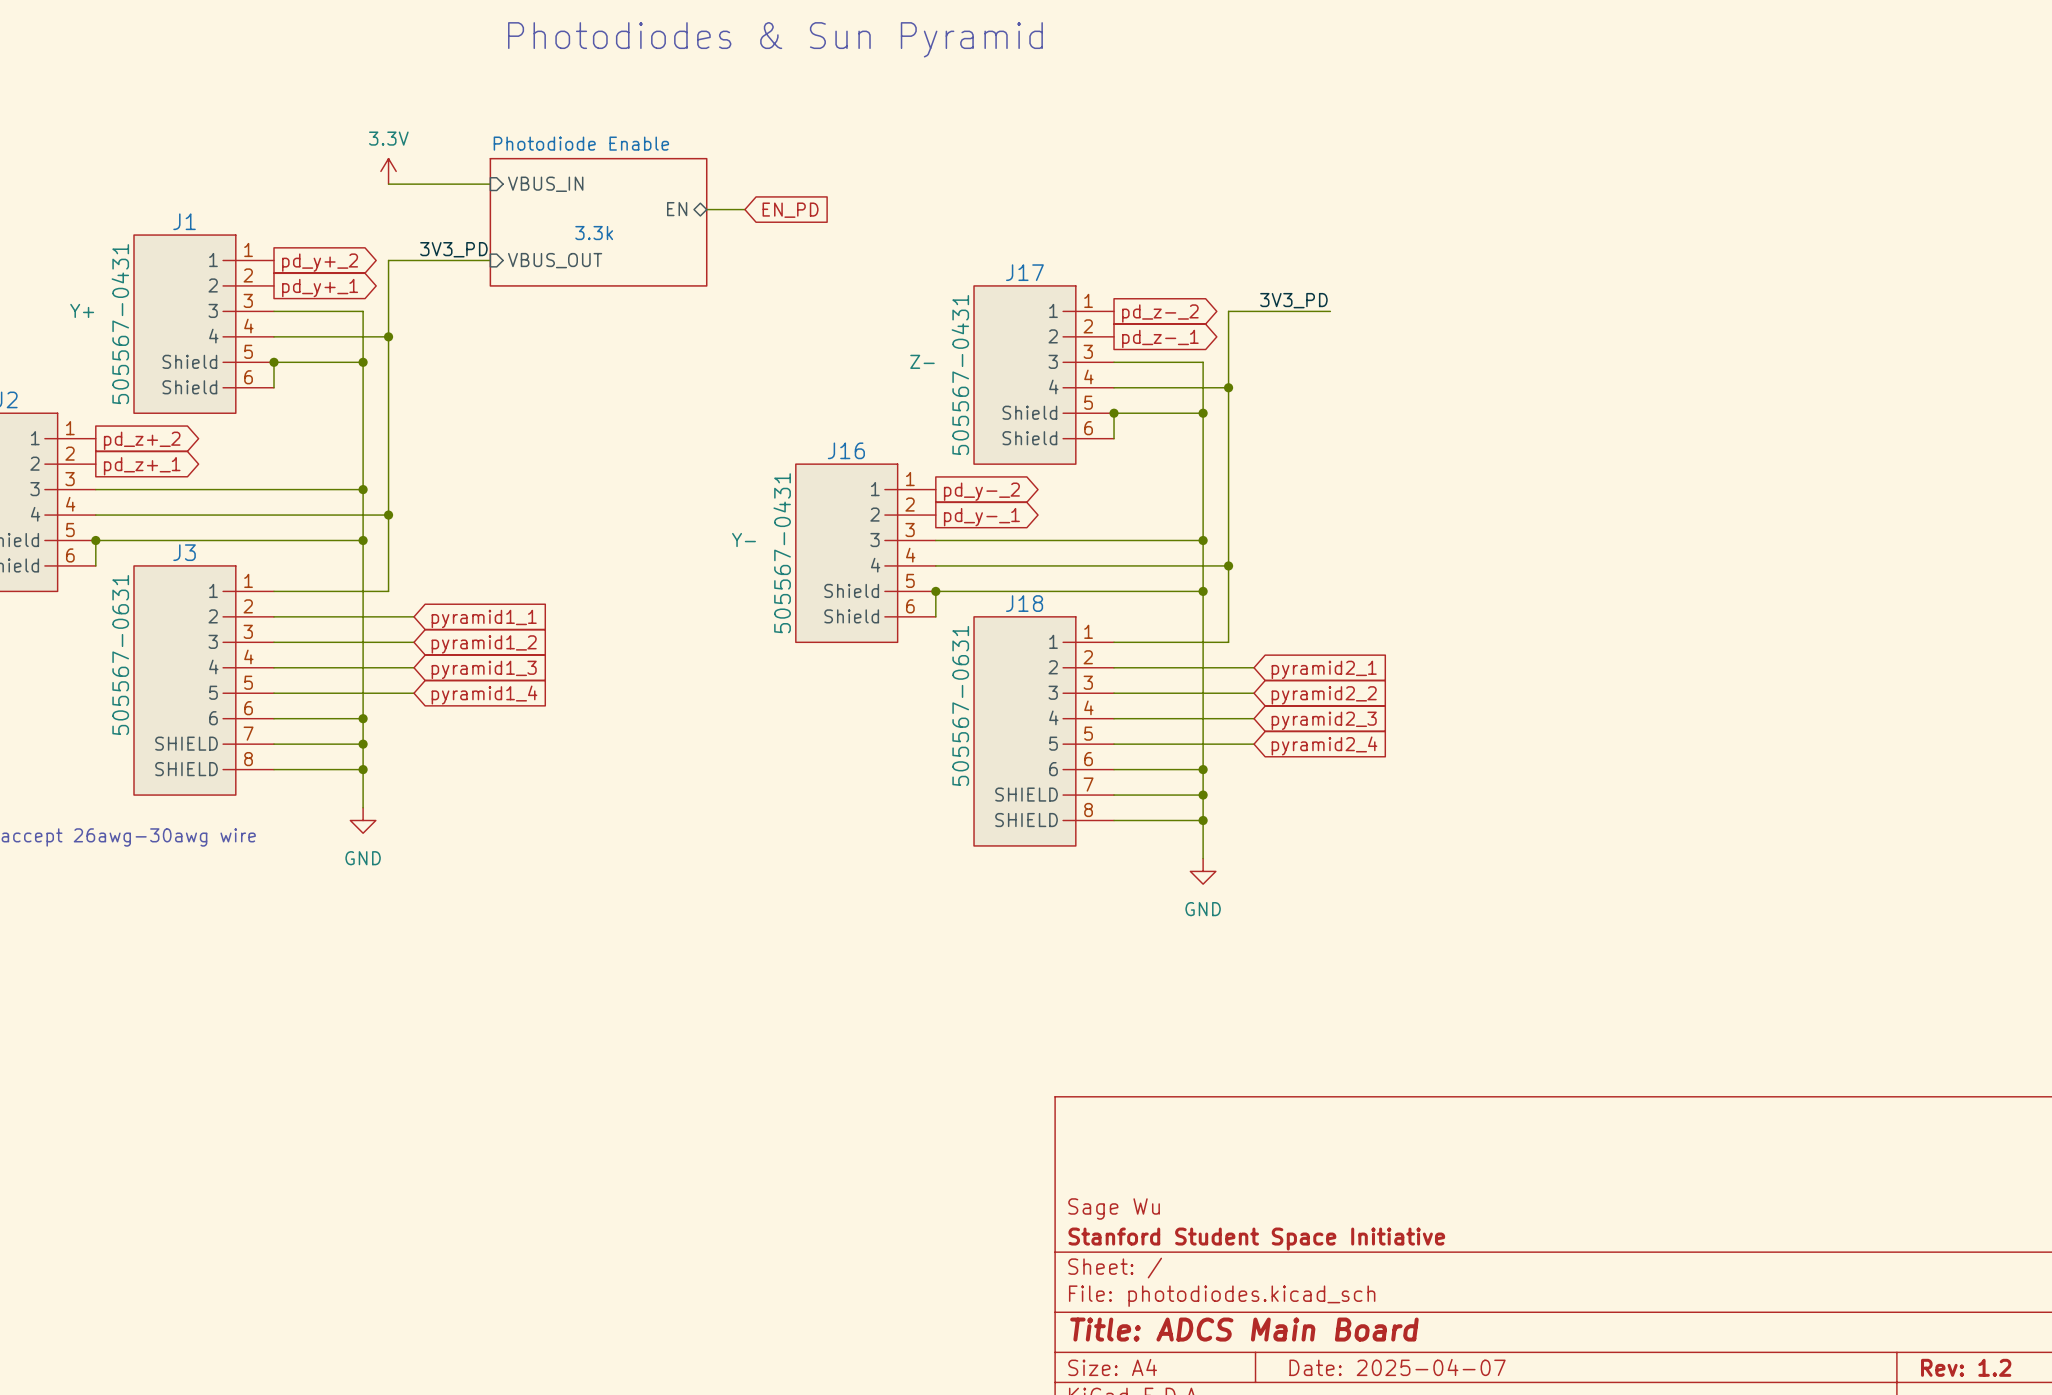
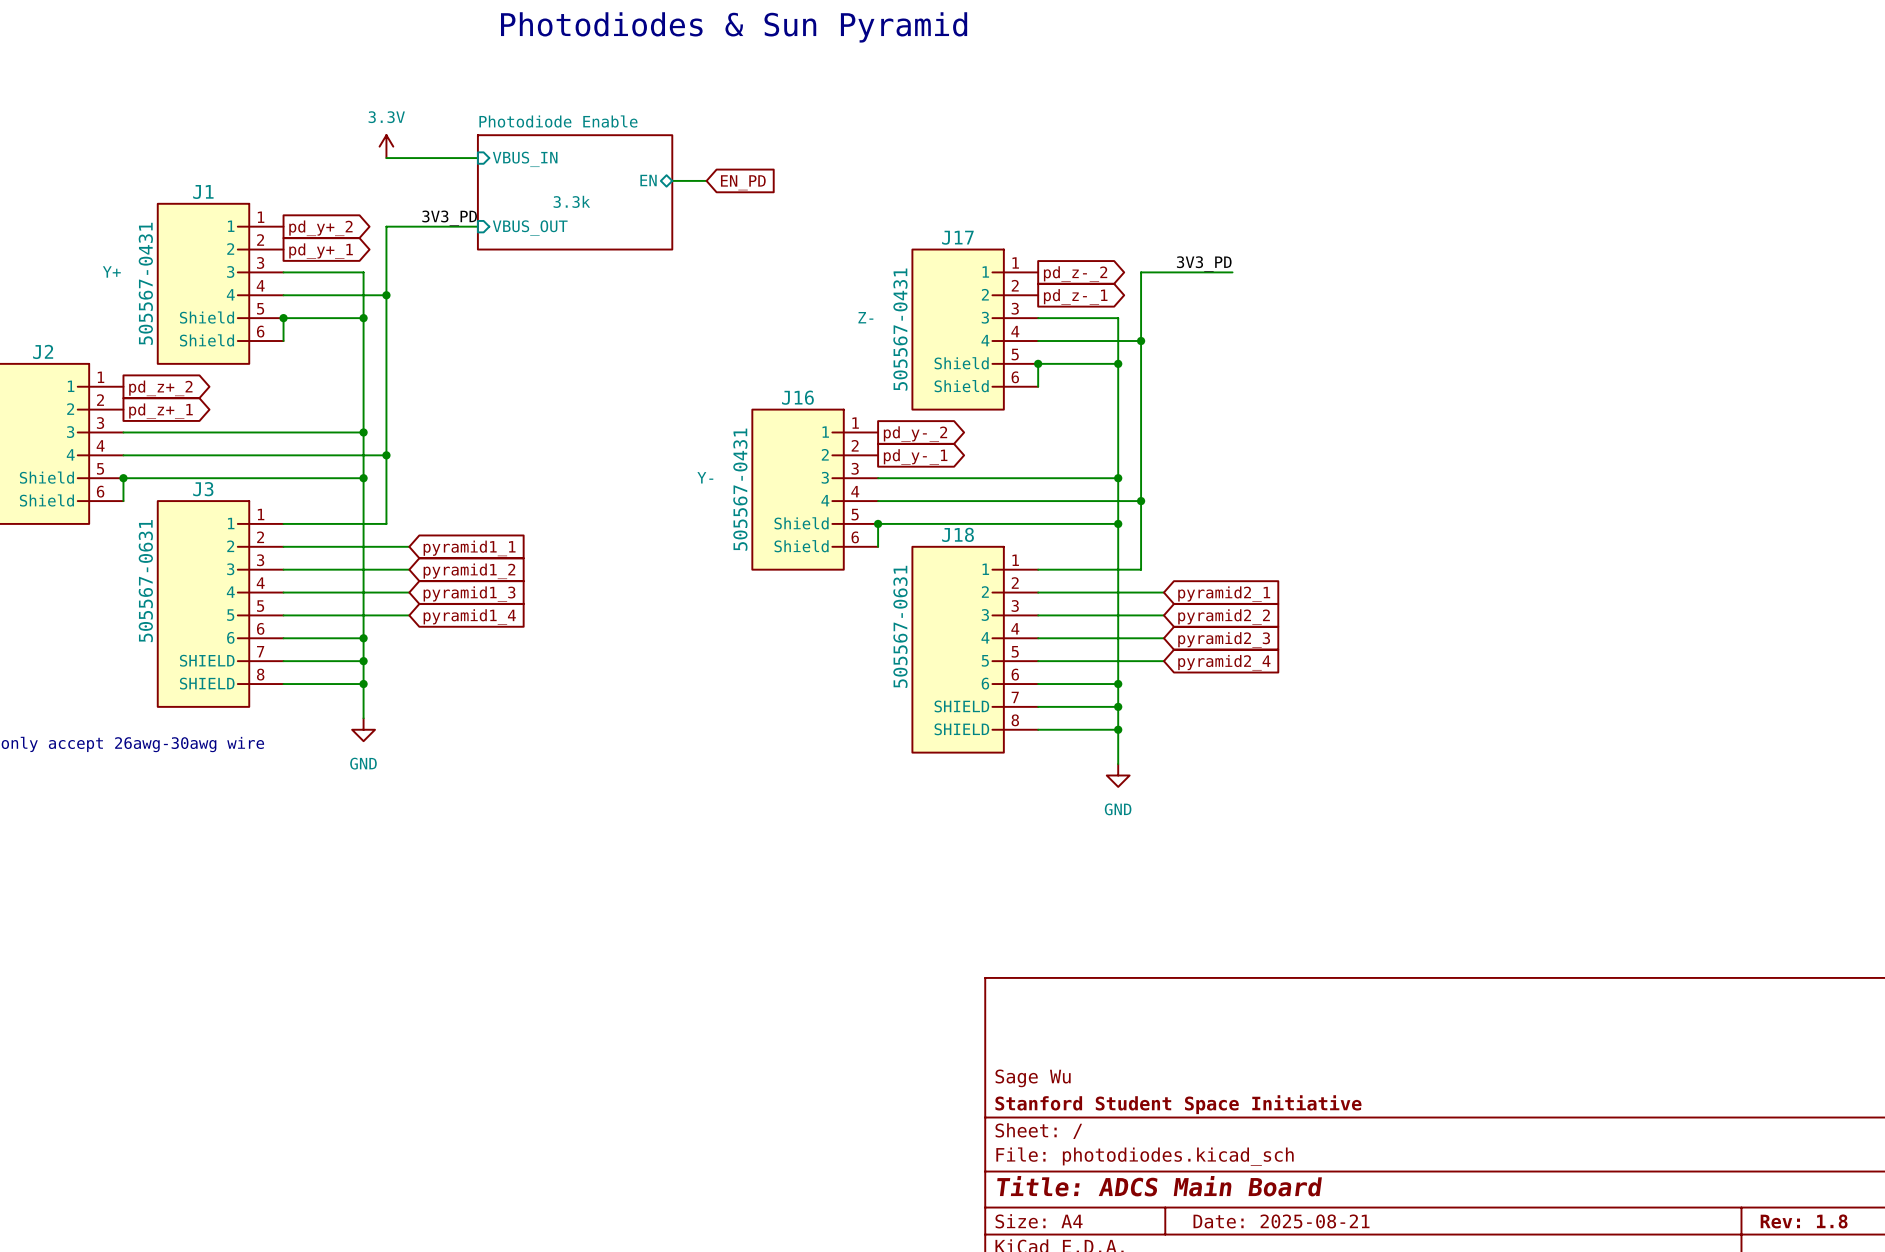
title block: Date: 2025-04-07 (1397, 1367) -> Date: 2025-08-21 (1281, 1221)
title block: Rev: 1.2 (1966, 1367) -> Rev: 1.8 (1804, 1221)

